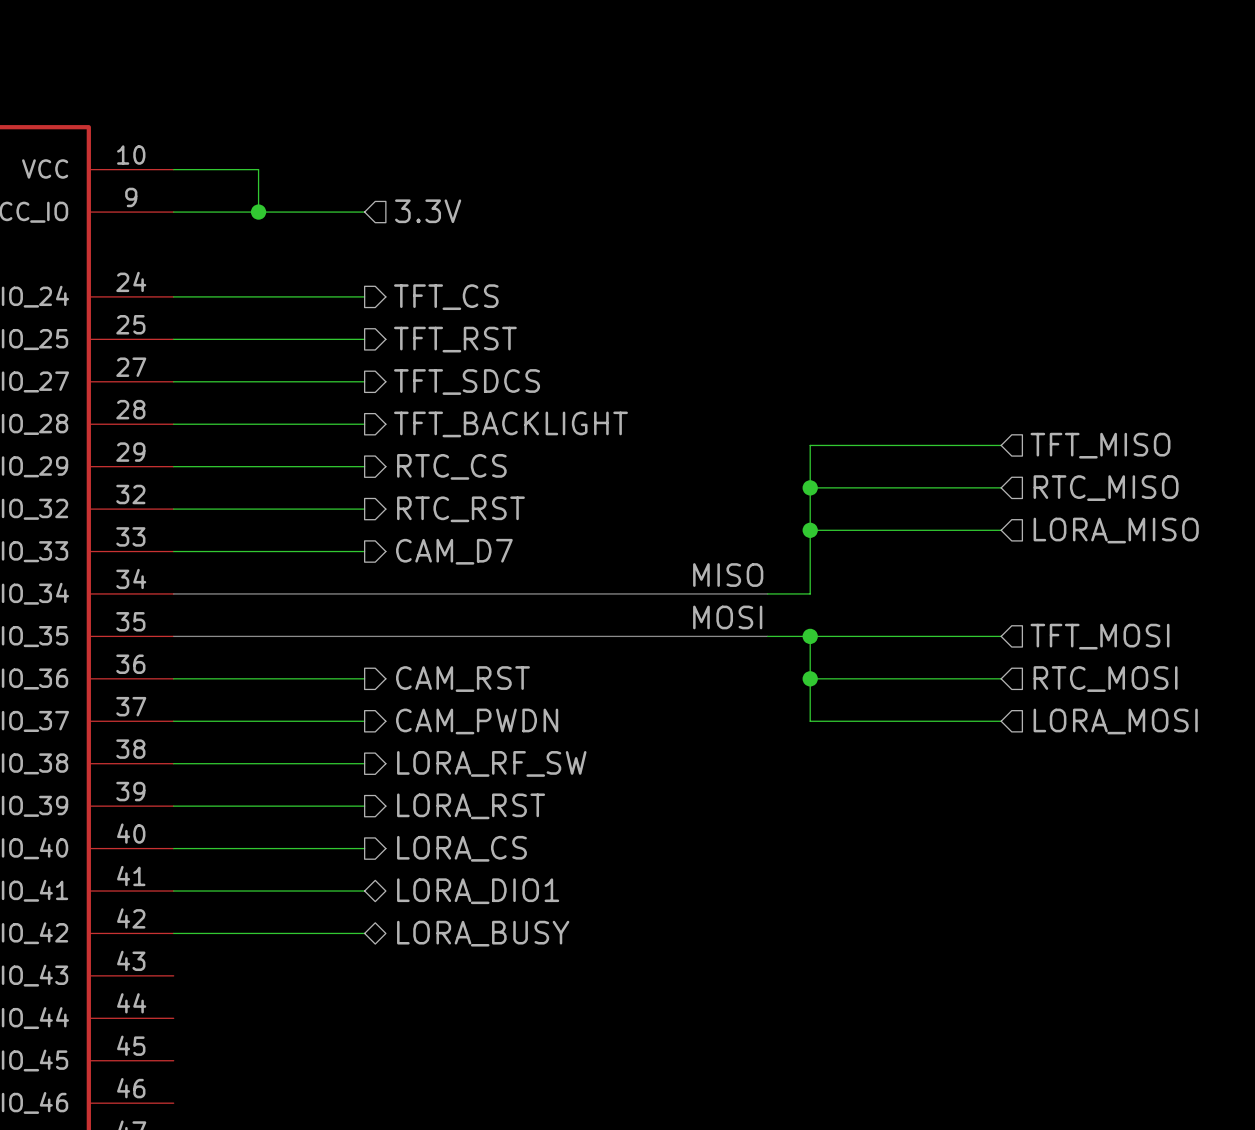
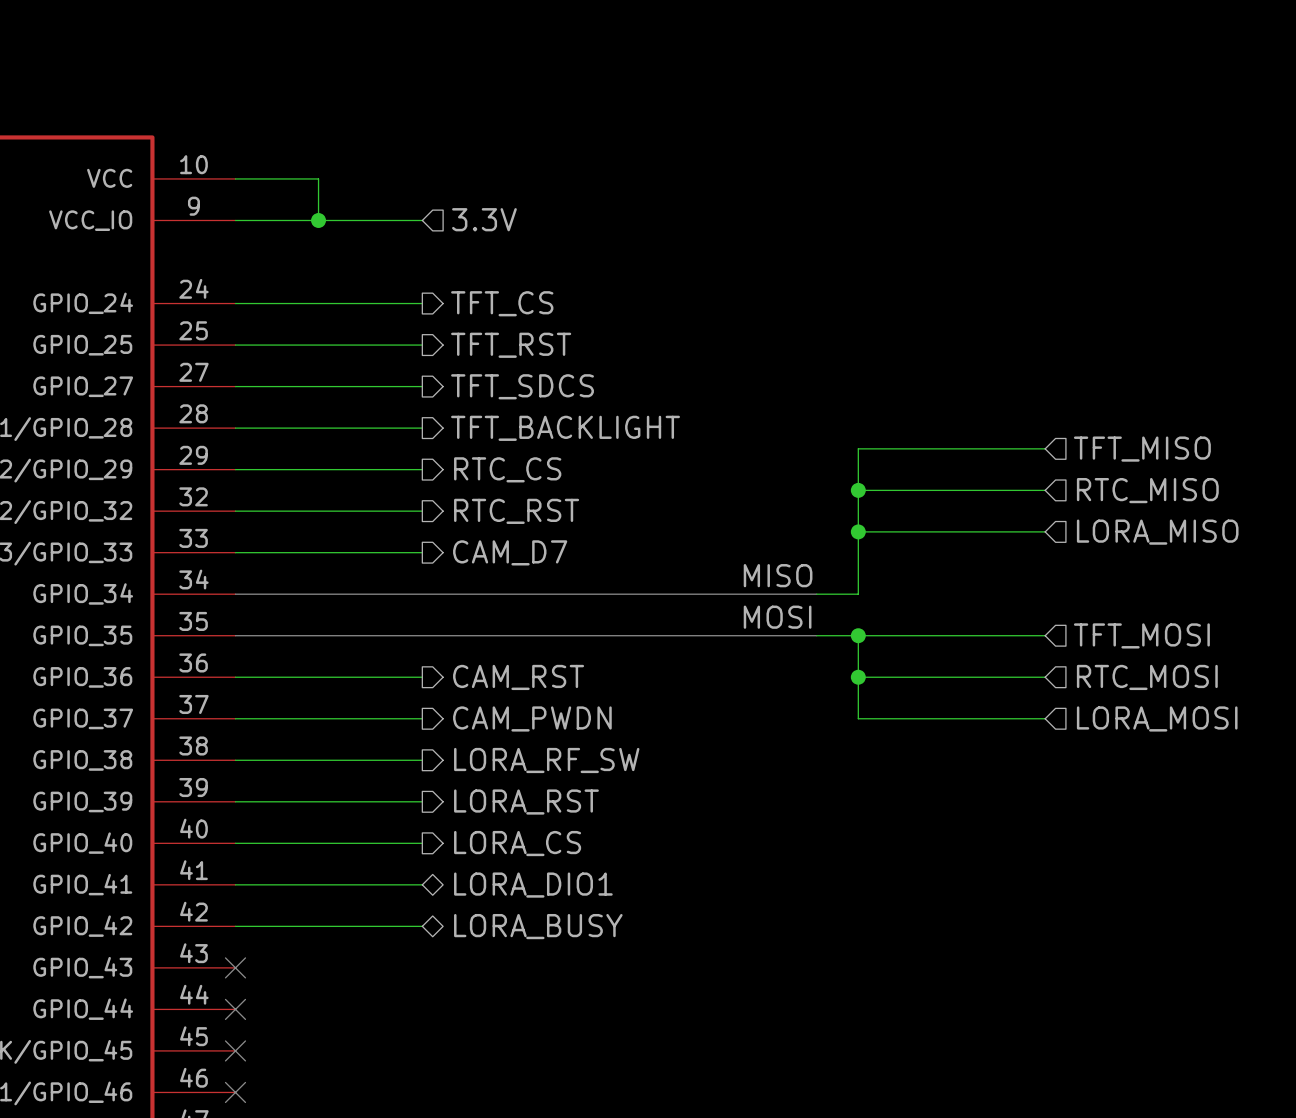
no-connect mark: none -> (235, 967)
no-connect mark: none -> (235, 1009)
no-connect mark: none -> (235, 1050)
no-connect mark: none -> (235, 1092)

